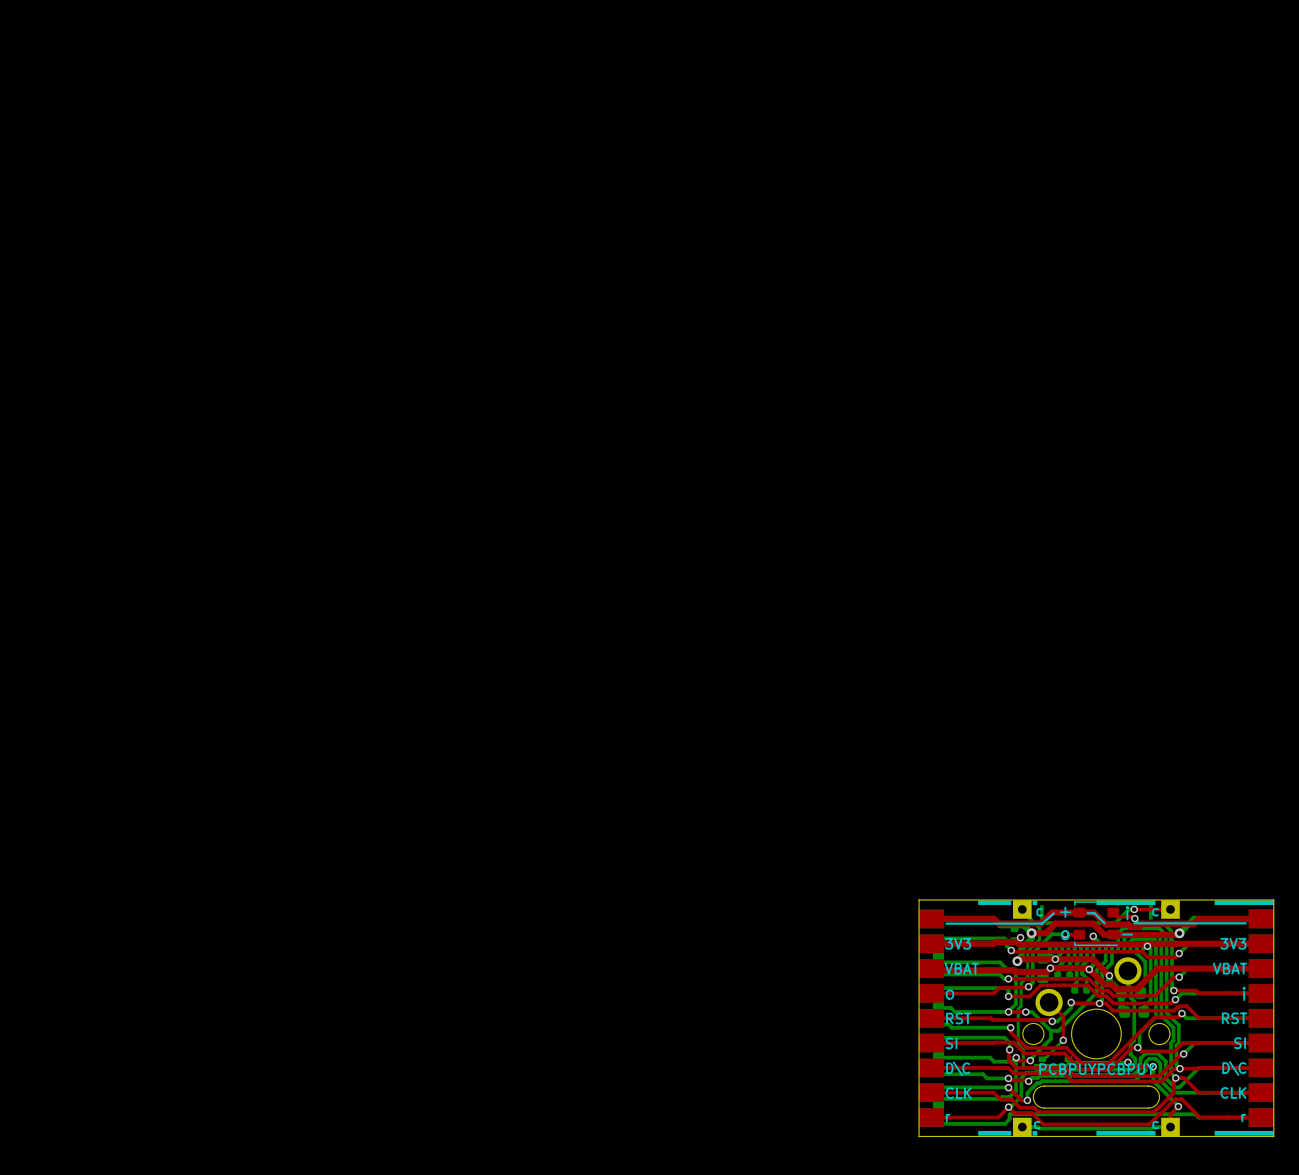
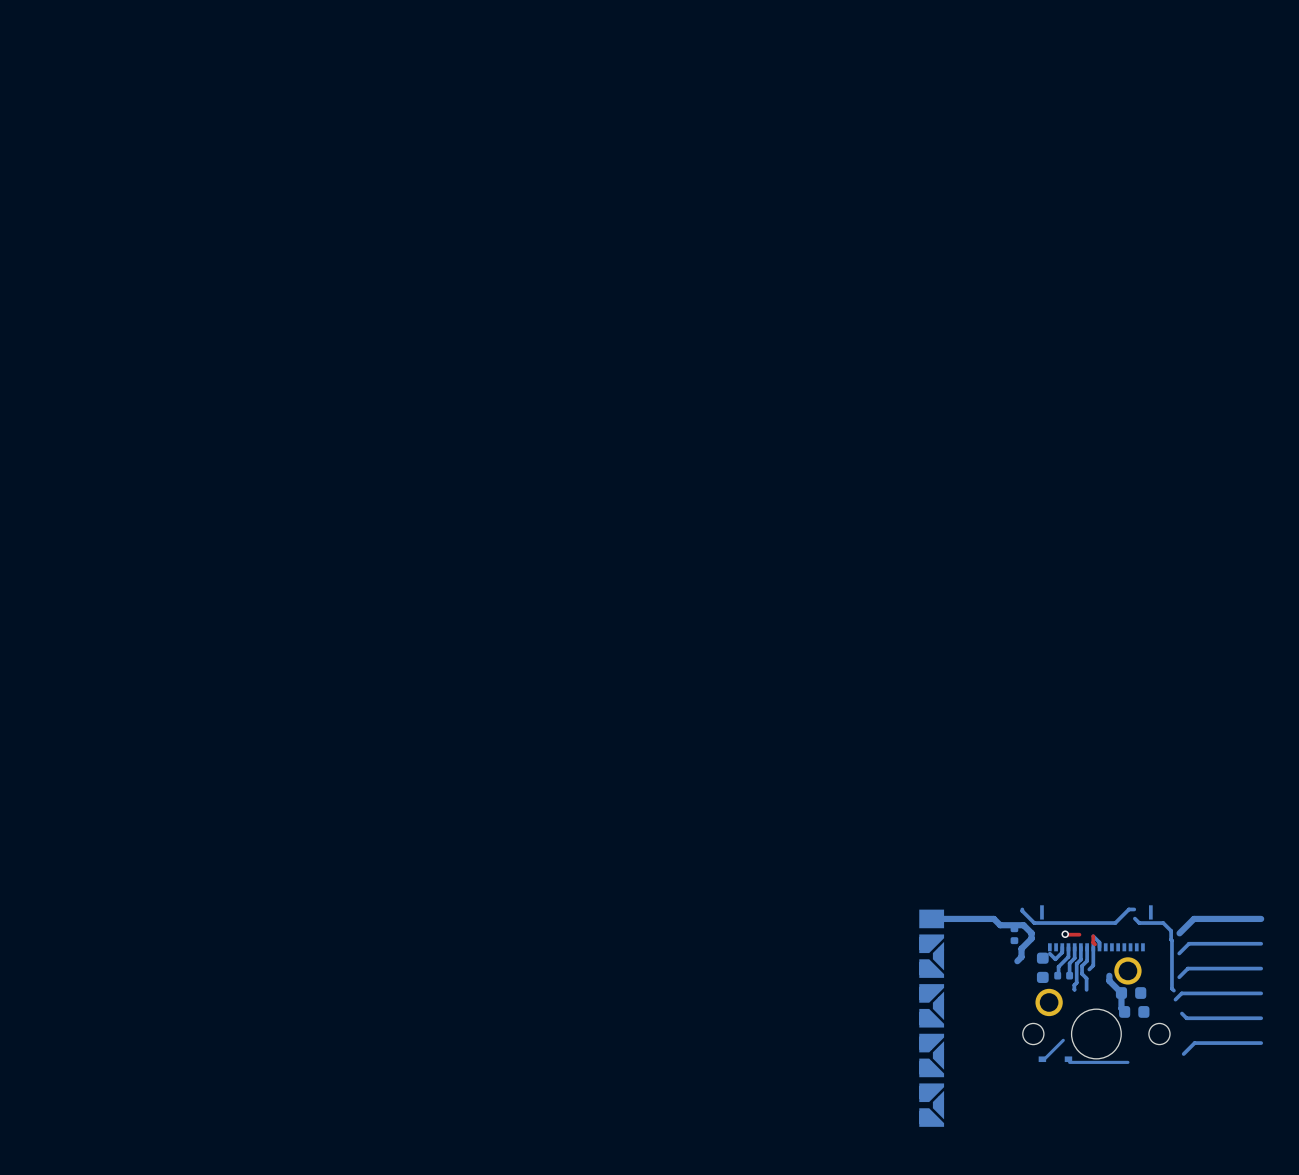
board edge: (919, 900) (1273, 900) (1273, 1136) (919, 1136) (919, 900) -> none
drawing: [978, 900, 1012, 906] -> none
drawing: [1032, 900, 1038, 906] -> none
drawing: [1096, 900, 1156, 906] -> none
drawing: [1214, 900, 1274, 906] -> none
part: (1022, 909) -> none
top track: (1134, 909) (1170, 909) -> none
via: (1134, 909) -> none
part: (1170, 909) -> none
text: c (1039, 912) -> none
top track: (1113, 912) (1117, 916) (1132, 916) (1134, 918) -> none
text: c (1155, 912) -> none
line: (1053, 913) (1042, 923) (946, 923) -> none
line: (1087, 913) (1094, 913) (1104, 923) -> none
top track: (931, 918) (993, 918) (998, 923) (1041, 923) (1052, 912) (1094, 912) (1105, 924) (1128, 924) (1130, 927) (1138, 927) (1142, 923) (1194, 923) (1198, 918) (1261, 918) -> none
via: (1134, 918) -> none
bottom track: (1034, 923) (1039, 928) (1039, 939) (1027, 951) (1027, 976) (1021, 983) (1021, 1006) (1018, 1008) (1018, 1044) (1023, 1049) (1023, 1066) (1033, 1067) (1035, 1065) (1066, 1065) (1069, 1062) (1069, 1059) -> none
part: (1096, 923) -> none
line: (1134, 923) (1245, 923) -> none
top track: (1031, 933) (1045, 933) (1055, 923) (1093, 923) (1104, 934) (1177, 934) (1179, 933) -> none
via: (1031, 933) -> none
via: (1179, 933) -> none
bottom track: (1065, 934) (1051, 934) (1032, 953) (1032, 982) (1028, 986) -> none
via: (1093, 936) -> none
via: (1020, 937) -> none
bottom track: (925, 943) (930, 938) (1004, 938) (1006, 945) (1011, 950) -> none
top track: (931, 943) (1016, 941) (1019, 944) (1145, 944) (1147, 946) (1150, 943) (1261, 943) -> none
text: 3V3 (958, 943) -> none
text: 3V3 (1233, 943) -> none
via: (1147, 946) -> none
bottom track: (1105, 947) (1105, 961) (1096, 970) (1096, 992) (1058, 1030) (1050, 1030) -> none
bottom track: (1111, 947) (1111, 962) (1102, 972) (1102, 1000) (1099, 1003) -> none
bottom track: (1118, 947) (1118, 933) (1123, 928) (1159, 928) (1165, 934) (1166, 1012) (1178, 1025) (1176, 1065) (1179, 1068) -> none
bottom track: (1124, 947) (1124, 938) (1128, 933) (1156, 933) (1160, 936) (1161, 1015) (1173, 1027) (1173, 1040) (1171, 1043) (1171, 1073) (1175, 1078) -> none
bottom track: (1130, 947) (1130, 941) (1132, 939) (1154, 939) (1155, 1017) (1139, 1033) (1139, 1045) (1137, 1047) -> none
bottom track: (1136, 947) (1136, 953) (1145, 961) (1145, 981) (1140, 986) (1140, 993) -> none
bottom track: (1142, 947) (1147, 946) (1150, 949) (1150, 1000) (1140, 1010) -> none
top track: (1011, 950) (1142, 951) (1147, 957) (1175, 957) (1179, 953) -> none
via: (1011, 950) -> none
via: (1179, 953) -> none
via: (1055, 959) -> none
bottom track: (941, 960) (943, 962) (1000, 962) (1009, 971) (1013, 971) (1016, 974) (1016, 1004) (1008, 1011) (954, 1011) (950, 1007) (943, 1007) -> none
top track: (1017, 961) (1019, 959) (1092, 959) (1109, 975) -> none
via: (1017, 961) -> none
bottom track: (925, 968) (931, 974) (999, 974) (1004, 978) (1008, 978) -> none
top track: (931, 968) (933, 970) (1046, 971) (1050, 968) (1087, 968) (1104, 984) (1111, 984) (1116, 989) (1136, 989) (1157, 968) (1261, 968) -> none
text: VBAT (961, 968) -> none
via: (1050, 968) -> none
text: VBAT (1230, 968) -> none
via: (1089, 969) -> none
bottom track: (1127, 970) (1127, 984) (1131, 987) (1131, 998) (1134, 1001) (1134, 1040) (1130, 1044) (1130, 1054) (1135, 1058) (1135, 1065) (1131, 1069) (1037, 1070) (1035, 1072) (1026, 1072) (1021, 1078) (1021, 1096) (1008, 1107) -> none
via: (1109, 975) -> none
top track: (1179, 977) (1173, 977) (1155, 995) (1113, 995) (1108, 990) (1102, 990) -> none
via: (1179, 977) -> none
top track: (1008, 978) (1088, 978) (1102, 990) -> none
via: (1008, 978) -> none
top track: (1028, 986) (999, 987) (993, 993) (931, 993) -> none
via: (1028, 986) -> none
part: (1080, 989) -> none
top track: (1173, 990) (1196, 990) (1198, 993) (1261, 993) -> none
via: (1173, 990) -> none
bottom track: (925, 993) (930, 988) (1006, 988) (1008, 990) (1008, 996) -> none
text: i (1244, 993) -> none
text: o (949, 994) -> none
via: (1008, 996) -> none
top track: (1100, 996) (1087, 985) (1040, 985) (1029, 996) (1008, 996) -> none
top track: (1100, 996) (1106, 996) (1113, 1003) (1171, 1003) (1175, 999) -> none
via: (1175, 999) -> none
top track: (1049, 1002) (1063, 1016) (1063, 1040) -> none
bottom track: (1071, 1002) (1071, 1007) (1057, 1021) (1052, 1021) -> none
top track: (1071, 1002) (1105, 1003) (1113, 1010) (1174, 1010) (1179, 1006) (1186, 1006) (1198, 1018) (1261, 1018) -> none
via: (1071, 1002) -> none
via: (1099, 1003) -> none
top track: (1008, 1011) (1025, 1011) -> none
via: (1008, 1011) -> none
bottom track: (1025, 1012) (1032, 1012) (1050, 1030) -> none
via: (1025, 1012) -> none
top track: (1181, 1013) (1178, 1017) (1154, 1017) (1108, 1063) (1082, 1063) (1066, 1048) (1026, 1048) (1010, 1032) (1010, 1027) -> none
via: (1181, 1013) -> none
bottom track: (925, 1018) (931, 1024) (948, 1024) (951, 1027) (1010, 1027) -> none
top track: (931, 1018) (990, 1018) (992, 1019) (1052, 1021) -> none
part: (931, 1018) -> none
text: RST (958, 1018) -> none
text: RST (1234, 1018) -> none
part: (1261, 1018) -> none
via: (1052, 1021) -> none
via: (1010, 1027) -> none
bottom track: (1050, 1030) (1050, 1038) (1030, 1060) -> none
via: (1063, 1040) -> none
bottom track: (925, 1043) (930, 1037) (1004, 1037) (1009, 1042) (1009, 1049) -> none
top track: (931, 1043) (1013, 1042) (1024, 1053) (1064, 1053) (1080, 1069) (1110, 1069) (1131, 1047) (1137, 1047) (1141, 1051) (1174, 1051) (1182, 1043) (1261, 1043) -> none
text: SI (951, 1043) -> none
text: SI (1240, 1043) -> none
via: (1137, 1047) -> none
top track: (1009, 1049) (1008, 1060) (1016, 1068) (1066, 1068) (1074, 1076) (1159, 1076) (1183, 1054) -> none
via: (1009, 1049) -> none
via: (1183, 1054) -> none
bottom track: (943, 1057) (989, 1057) (994, 1061) (1012, 1061) (1016, 1057) -> none
bottom track: (1016, 1057) (1016, 1090) (1009, 1097) (1000, 1098) (940, 1098) -> none
top track: (1016, 1057) (1019, 1060) (1030, 1060) -> none
via: (1016, 1057) -> none
via: (1030, 1060) -> none
top track: (1127, 1062) (1132, 1066) (1153, 1066) -> none
via: (1127, 1062) -> none
bottom track: (1153, 1066) (1153, 1081) (1178, 1106) -> none
via: (1153, 1066) -> none
bottom track: (925, 1067) (931, 1074) (982, 1074) (987, 1078) (1008, 1078) -> none
top track: (931, 1067) (1008, 1067) (1014, 1073) (1063, 1073) (1071, 1081) (1161, 1081) (1174, 1068) (1261, 1067) -> none
bottom track: (1261, 1067) (1198, 1067) (1179, 1087) (1174, 1087) (1165, 1078) (1165, 1061) (1157, 1053) (1145, 1053) (1140, 1058) (1140, 1068) (1133, 1074) (1039, 1075) (1031, 1077) (1028, 1081) -> none
text: D\C (958, 1068) -> none
via: (1179, 1068) -> none
text: D\C (1234, 1068) -> none
text: PCBPUYPCBPUY (1097, 1069) -> none
top track: (1008, 1078) (1010, 1080) (1028, 1081) -> none
via: (1008, 1078) -> none
via: (1175, 1078) -> none
via: (1028, 1081) -> none
board edge: (1044, 1086) (1149, 1086) (1157, 1090) (1159, 1098) (1156, 1104) (1149, 1108) (1042, 1108) (1035, 1103) (1033, 1095) (1037, 1088) (1044, 1086) -> none
bottom track: (1008, 1087) (930, 1087) (925, 1092) -> none
top track: (1008, 1087) (1021, 1100) (1027, 1100) -> none
via: (1008, 1087) -> none
top track: (931, 1092) (993, 1092) (1000, 1099) (1011, 1099) (1019, 1107) (1034, 1107) (1038, 1112) (1153, 1112) (1173, 1092) (1173, 1079) (1175, 1078) (1184, 1078) (1198, 1092) (1261, 1092) -> none
text: CLK (1233, 1092) -> none
bottom track: (1261, 1092) (1172, 1092) (1160, 1080) (1160, 1063) (1155, 1058) (1149, 1058) (1145, 1062) (1145, 1070) (1134, 1081) (1042, 1081) (1037, 1083) (1027, 1092) (1027, 1100) -> none
text: CLK (958, 1093) -> none
via: (1027, 1100) -> none
top track: (1178, 1106) (1170, 1114) (1170, 1127) -> none
via: (1178, 1106) -> none
via: (1008, 1107) -> none
bottom track: (925, 1117) (931, 1123) (1004, 1123) (1009, 1119) (1010, 1114) (1195, 1114) (1198, 1117) (1261, 1117) -> none
top track: (931, 1117) (998, 1117) (1008, 1107) (1014, 1113) (1031, 1113) (1043, 1124) (1149, 1124) (1175, 1099) (1181, 1099) (1200, 1117) (1261, 1117) -> none
text: r (948, 1118) -> none
text: r (1243, 1118) -> none
text: c (1037, 1125) -> none
text: c (1155, 1125) -> none
bottom track: (1022, 1127) (1039, 1128) (1170, 1127) -> none
part: (1022, 1127) -> none
part: (1170, 1127) -> none
drawing: [978, 1130, 1012, 1136] -> none
drawing: [1032, 1130, 1038, 1136] -> none
drawing: [1096, 1130, 1156, 1136] -> none
drawing: [1214, 1130, 1274, 1136] -> none

